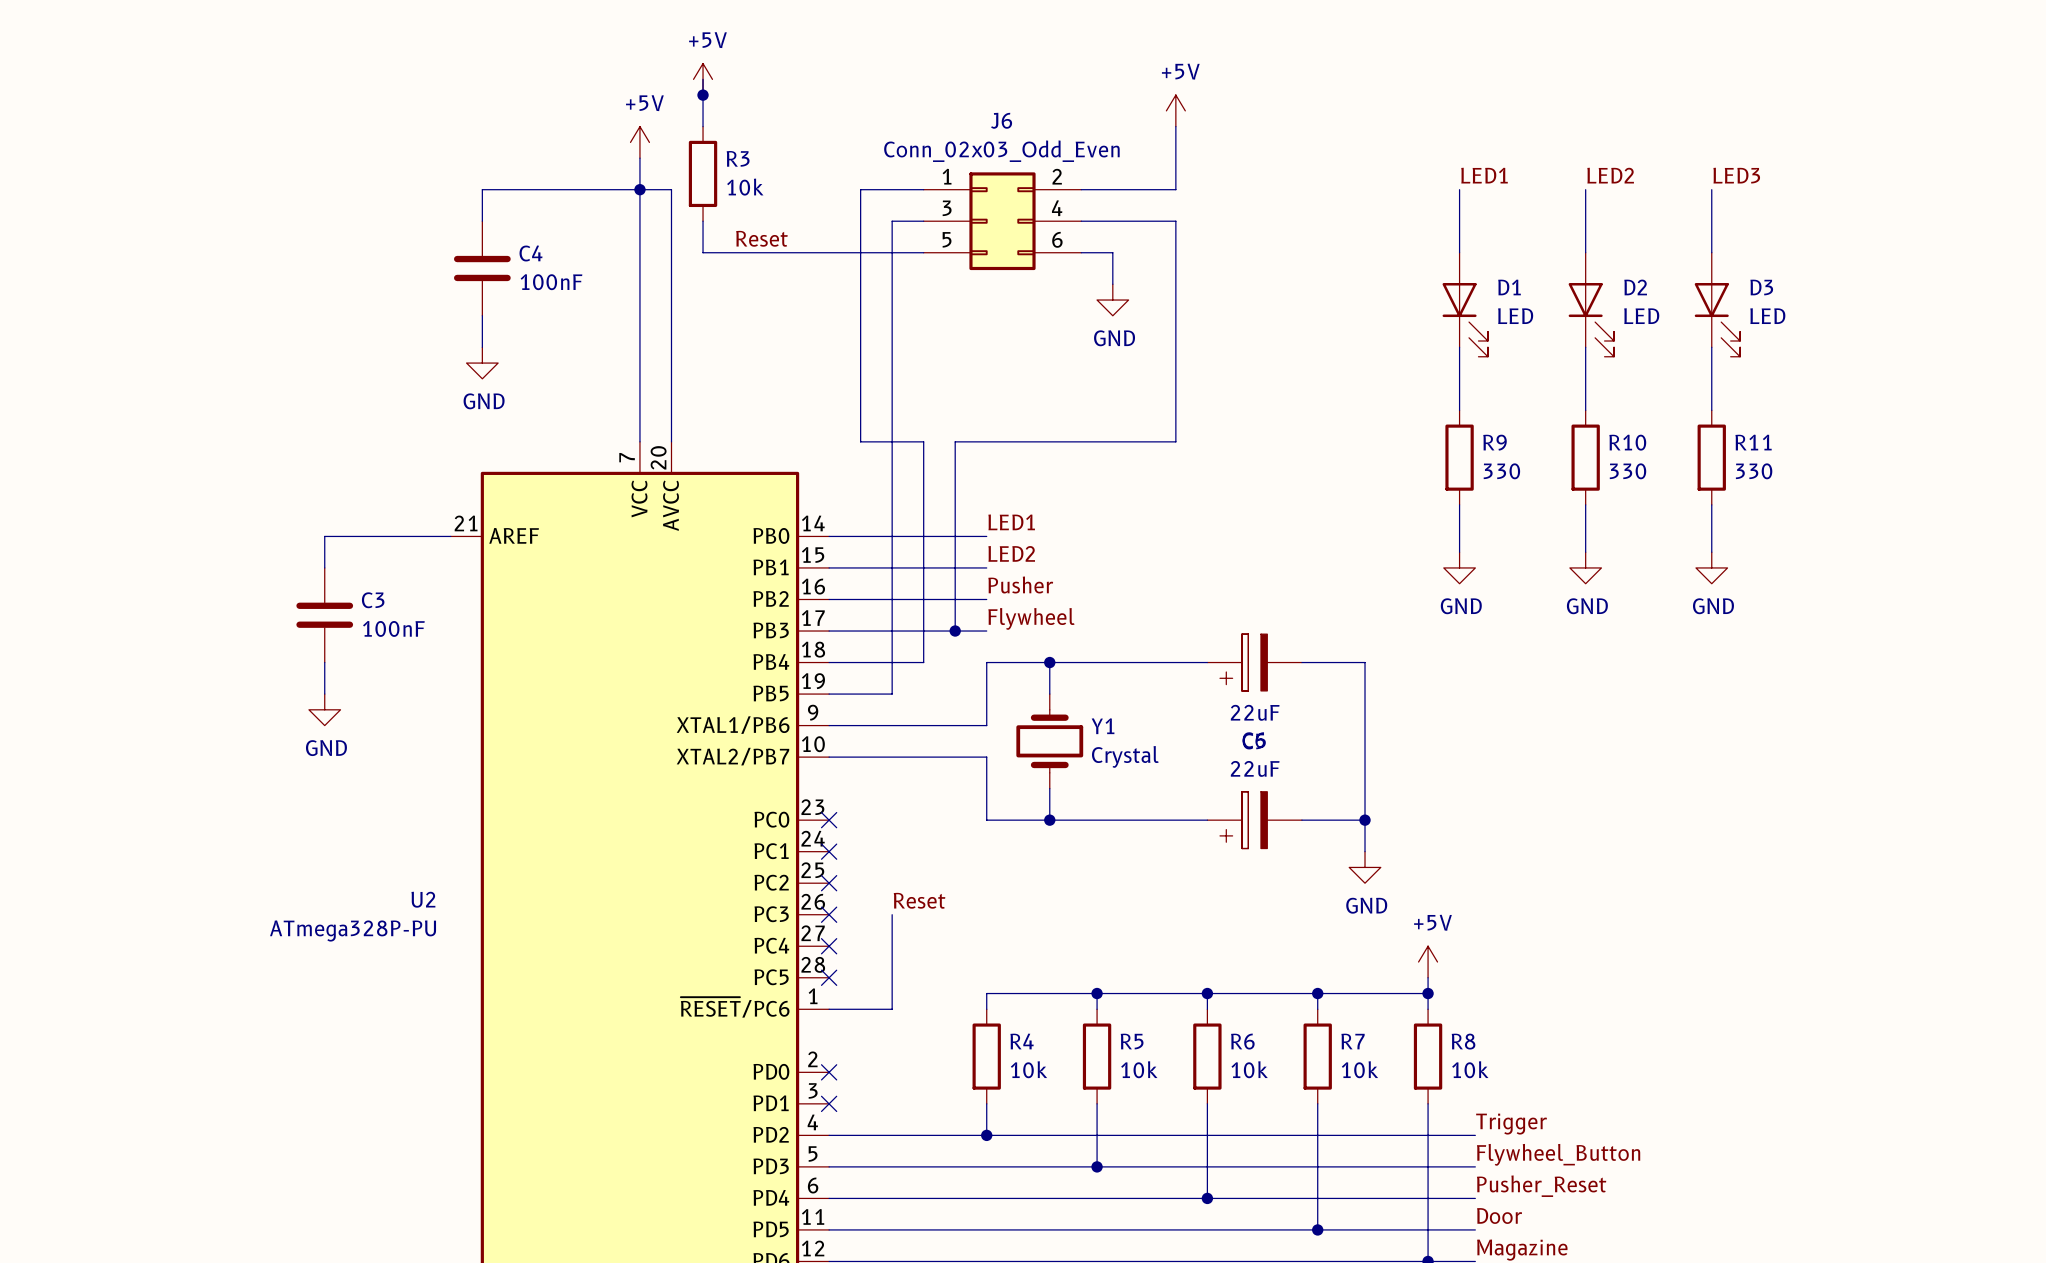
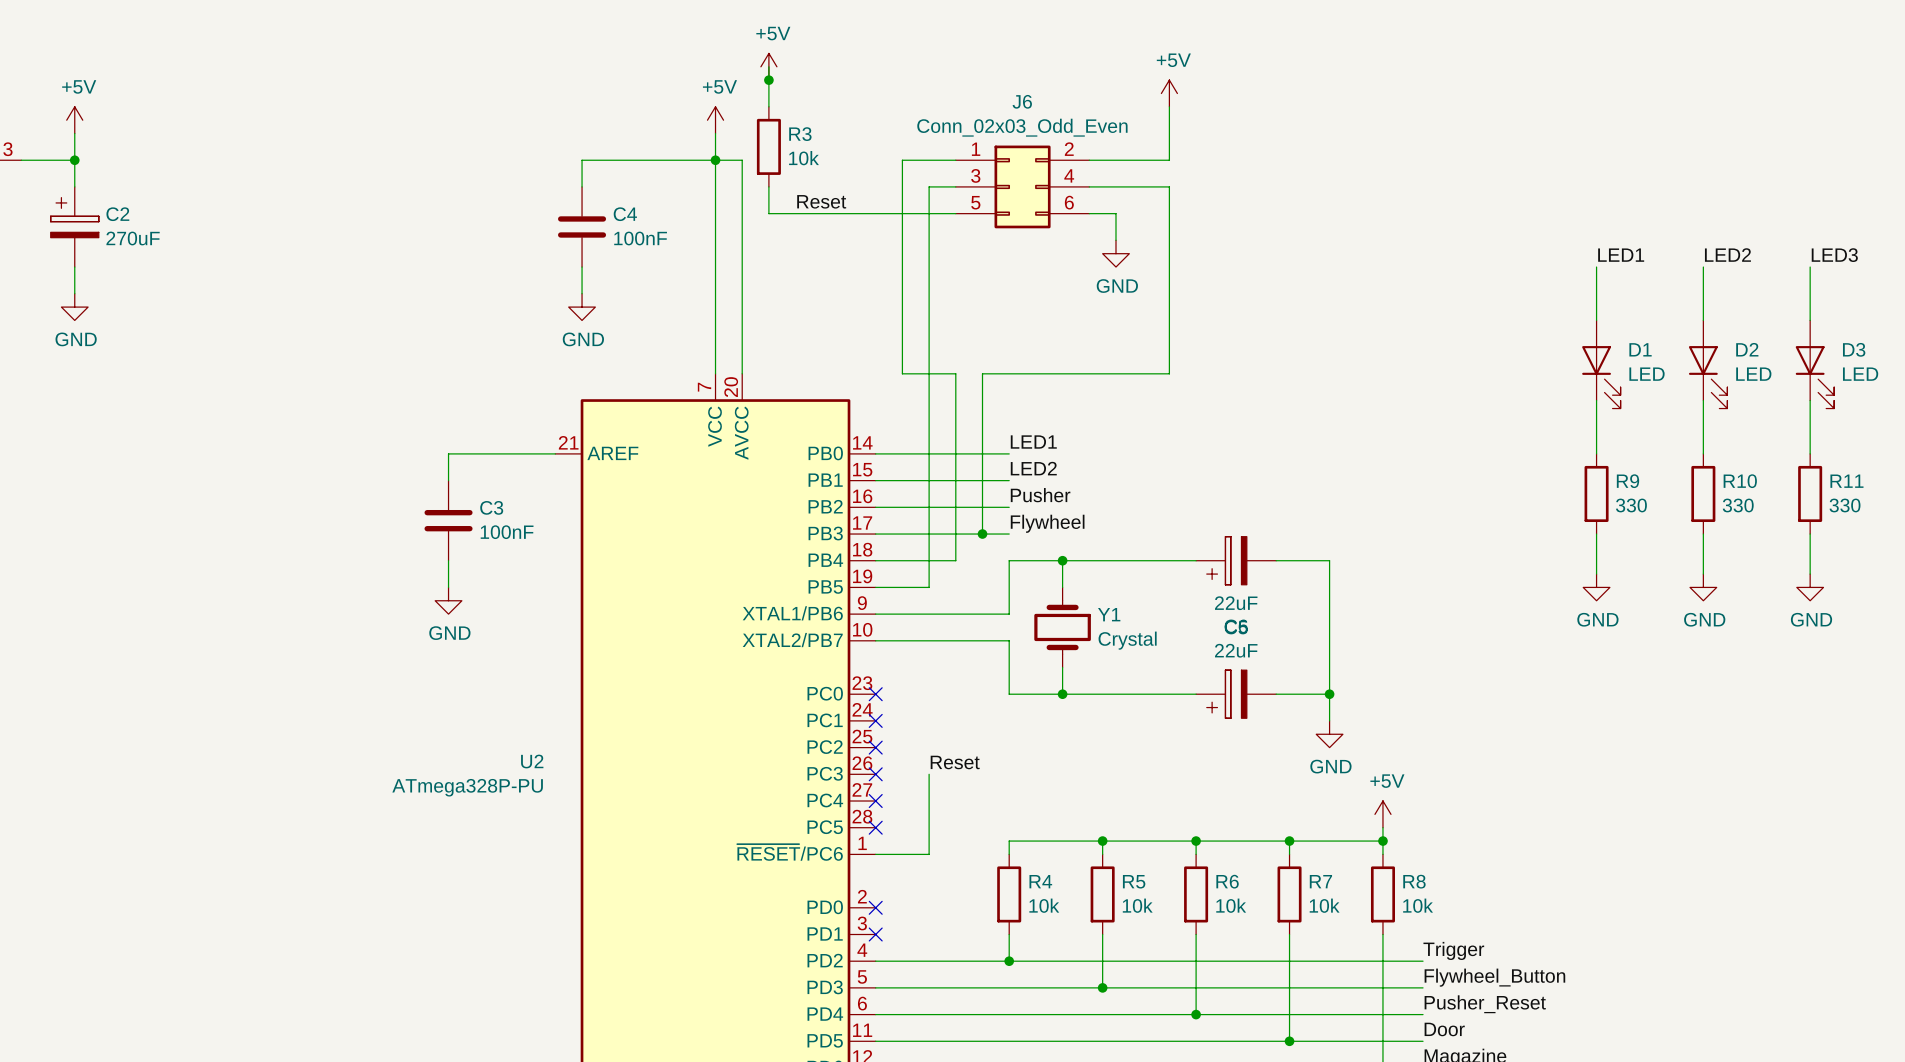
label position: LED1 (1484, 175) -> LED1 (1621, 255)
label position: LED2 (1610, 175) -> LED2 (1727, 255)
label position: LED3 (1736, 175) -> LED3 (1834, 255)
wire: (1459, 189) (1459, 252) -> (1596, 267) (1596, 320)
wire: (1585, 189) (1585, 252) -> (1703, 267) (1703, 320)
wire: (1711, 189) (1711, 252) -> (1810, 267) (1810, 320)
D1 position: (1465, 304) -> (1601, 364)
D2 position: (1591, 304) -> (1708, 364)
D3 position: (1717, 304) -> (1814, 364)
wire: (1459, 347) (1459, 410) -> (1596, 400) (1596, 453)
wire: (1585, 347) (1585, 410) -> (1703, 400) (1703, 453)
wire: (1711, 347) (1711, 410) -> (1810, 400) (1810, 453)
R9 position: (1459, 457) -> (1596, 493)
R10 position: (1585, 457) -> (1703, 493)
R11 position: (1711, 457) -> (1810, 493)
wire: (1459, 504) (1459, 552) -> (1596, 534) (1596, 574)
wire: (1585, 504) (1585, 552) -> (1703, 534) (1703, 574)
wire: (1711, 504) (1711, 552) -> (1810, 534) (1810, 574)
power symbol: GND (1459, 567) -> none
power symbol: GND (1585, 567) -> none
power symbol: GND (1711, 567) -> none
power symbol: none -> GND (1596, 587)
power symbol: none -> GND (1703, 587)
power symbol: none -> GND (1810, 587)

